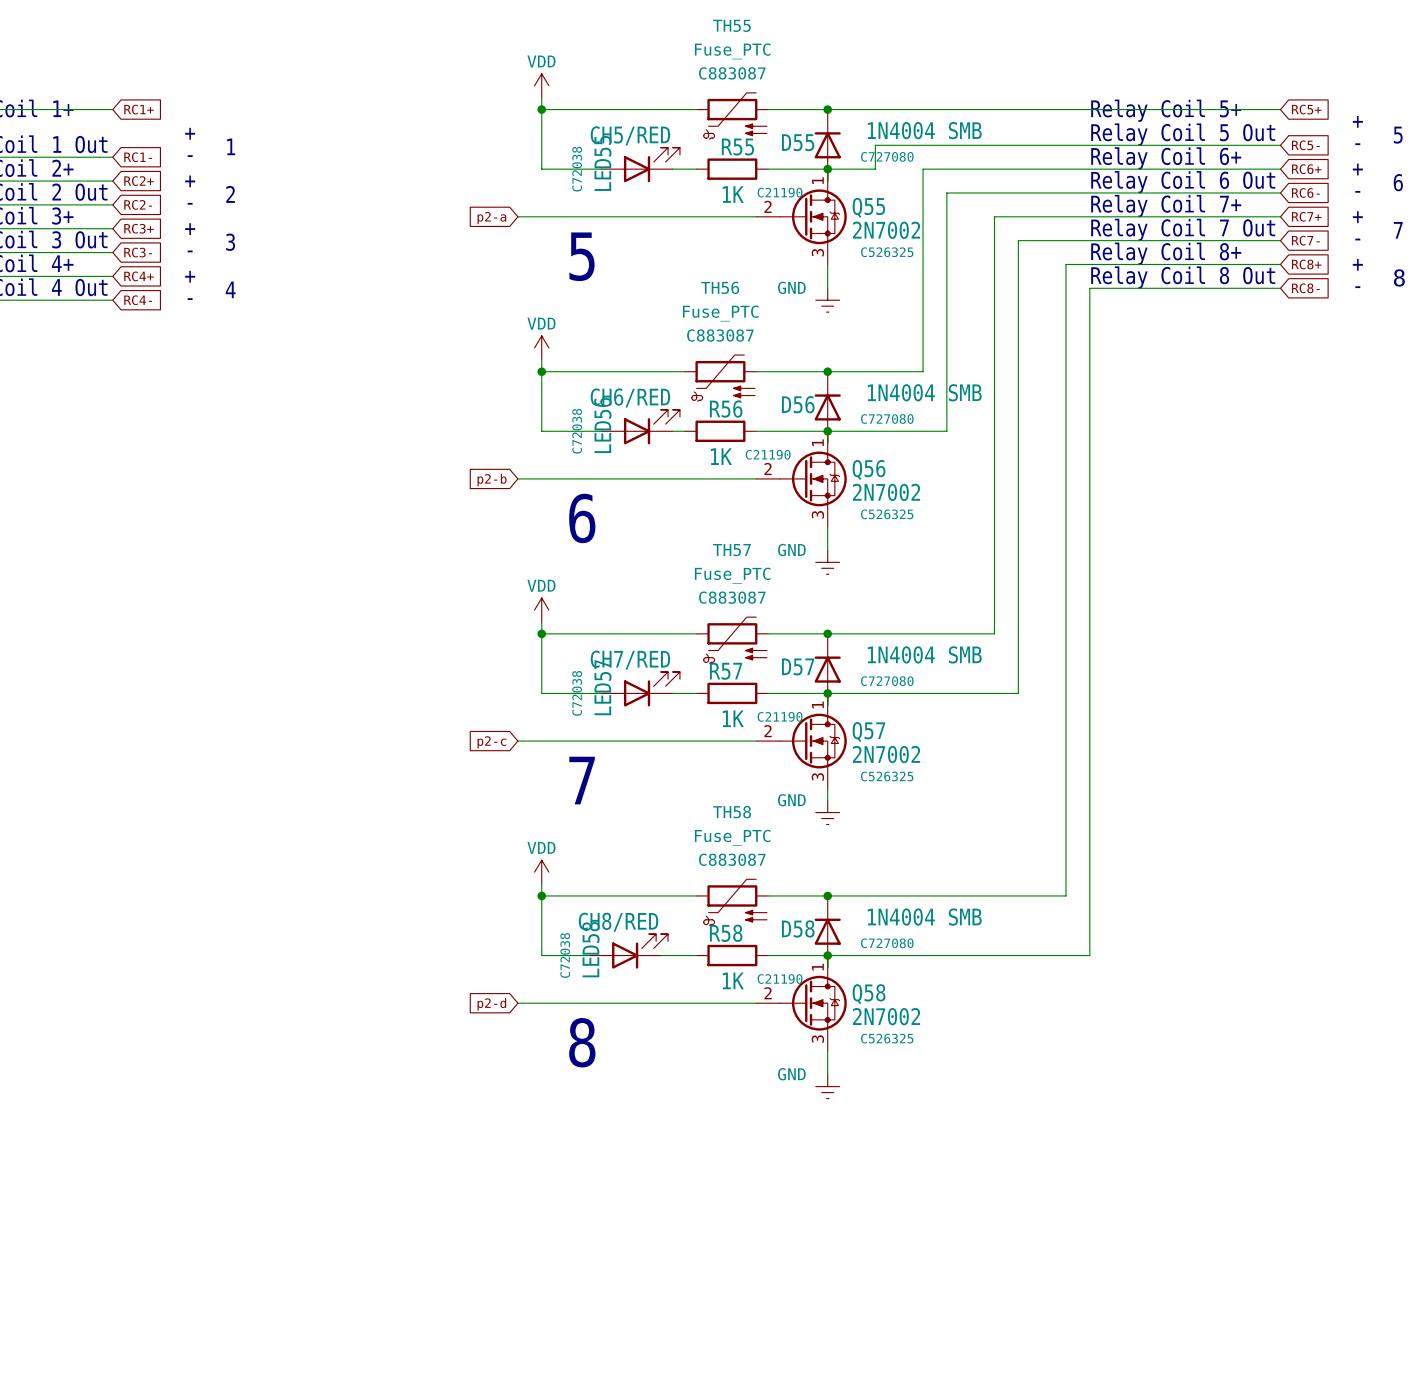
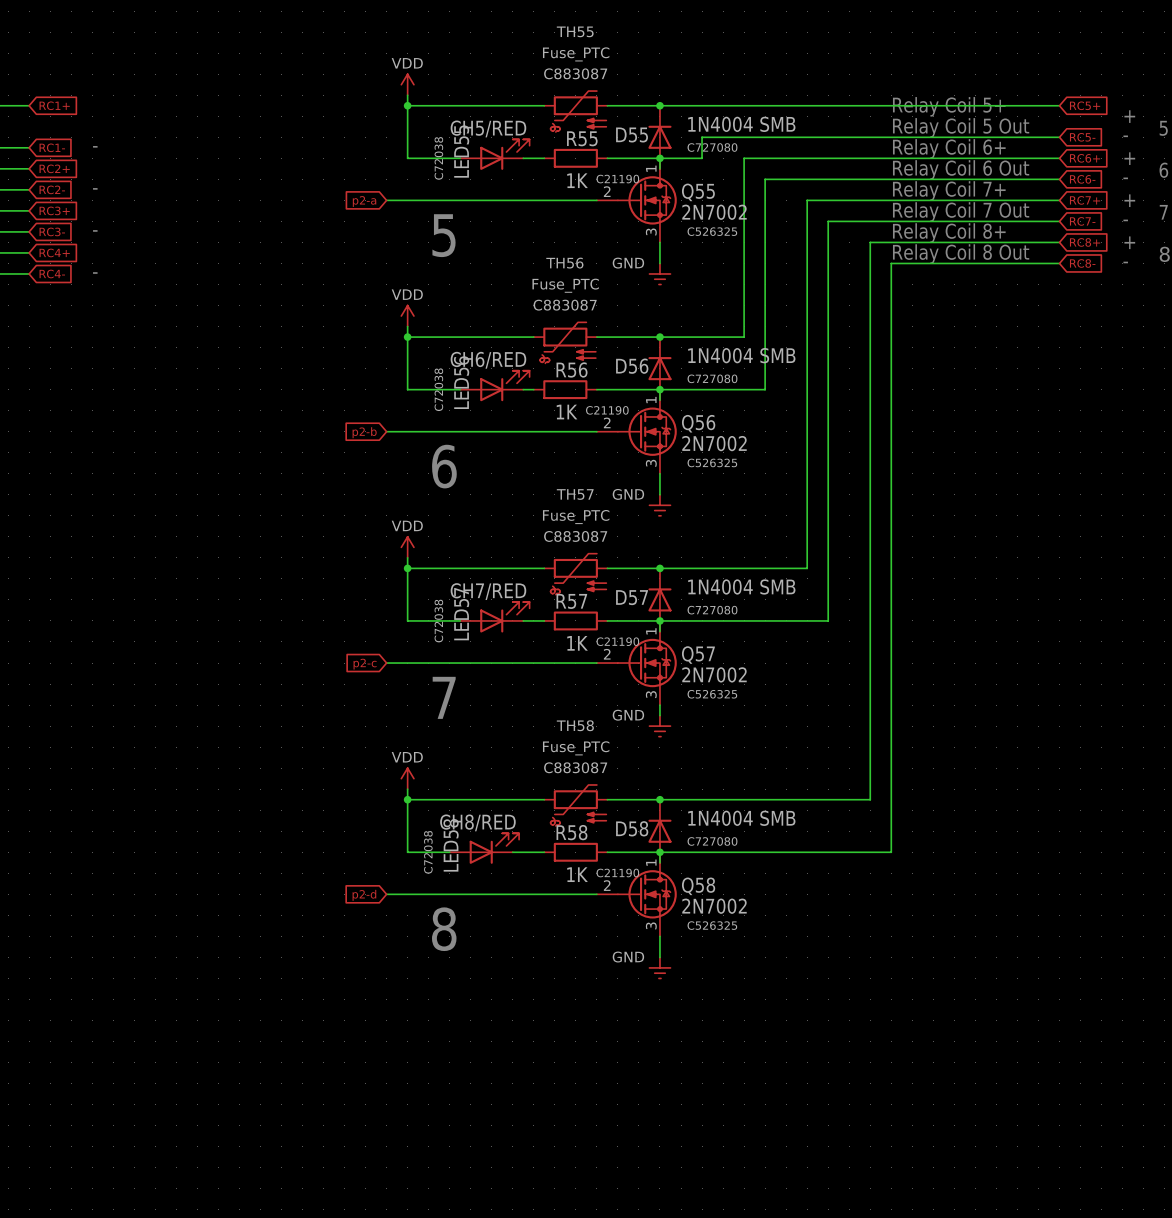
text: + (190, 133) -> none
text: 1 (231, 146) -> none
text: + (190, 181) -> none
text: 2 (230, 194) -> none
text: + (190, 229) -> none
text: 3 (230, 242) -> none
text: + (190, 276) -> none
text: 4 (230, 289) -> none

